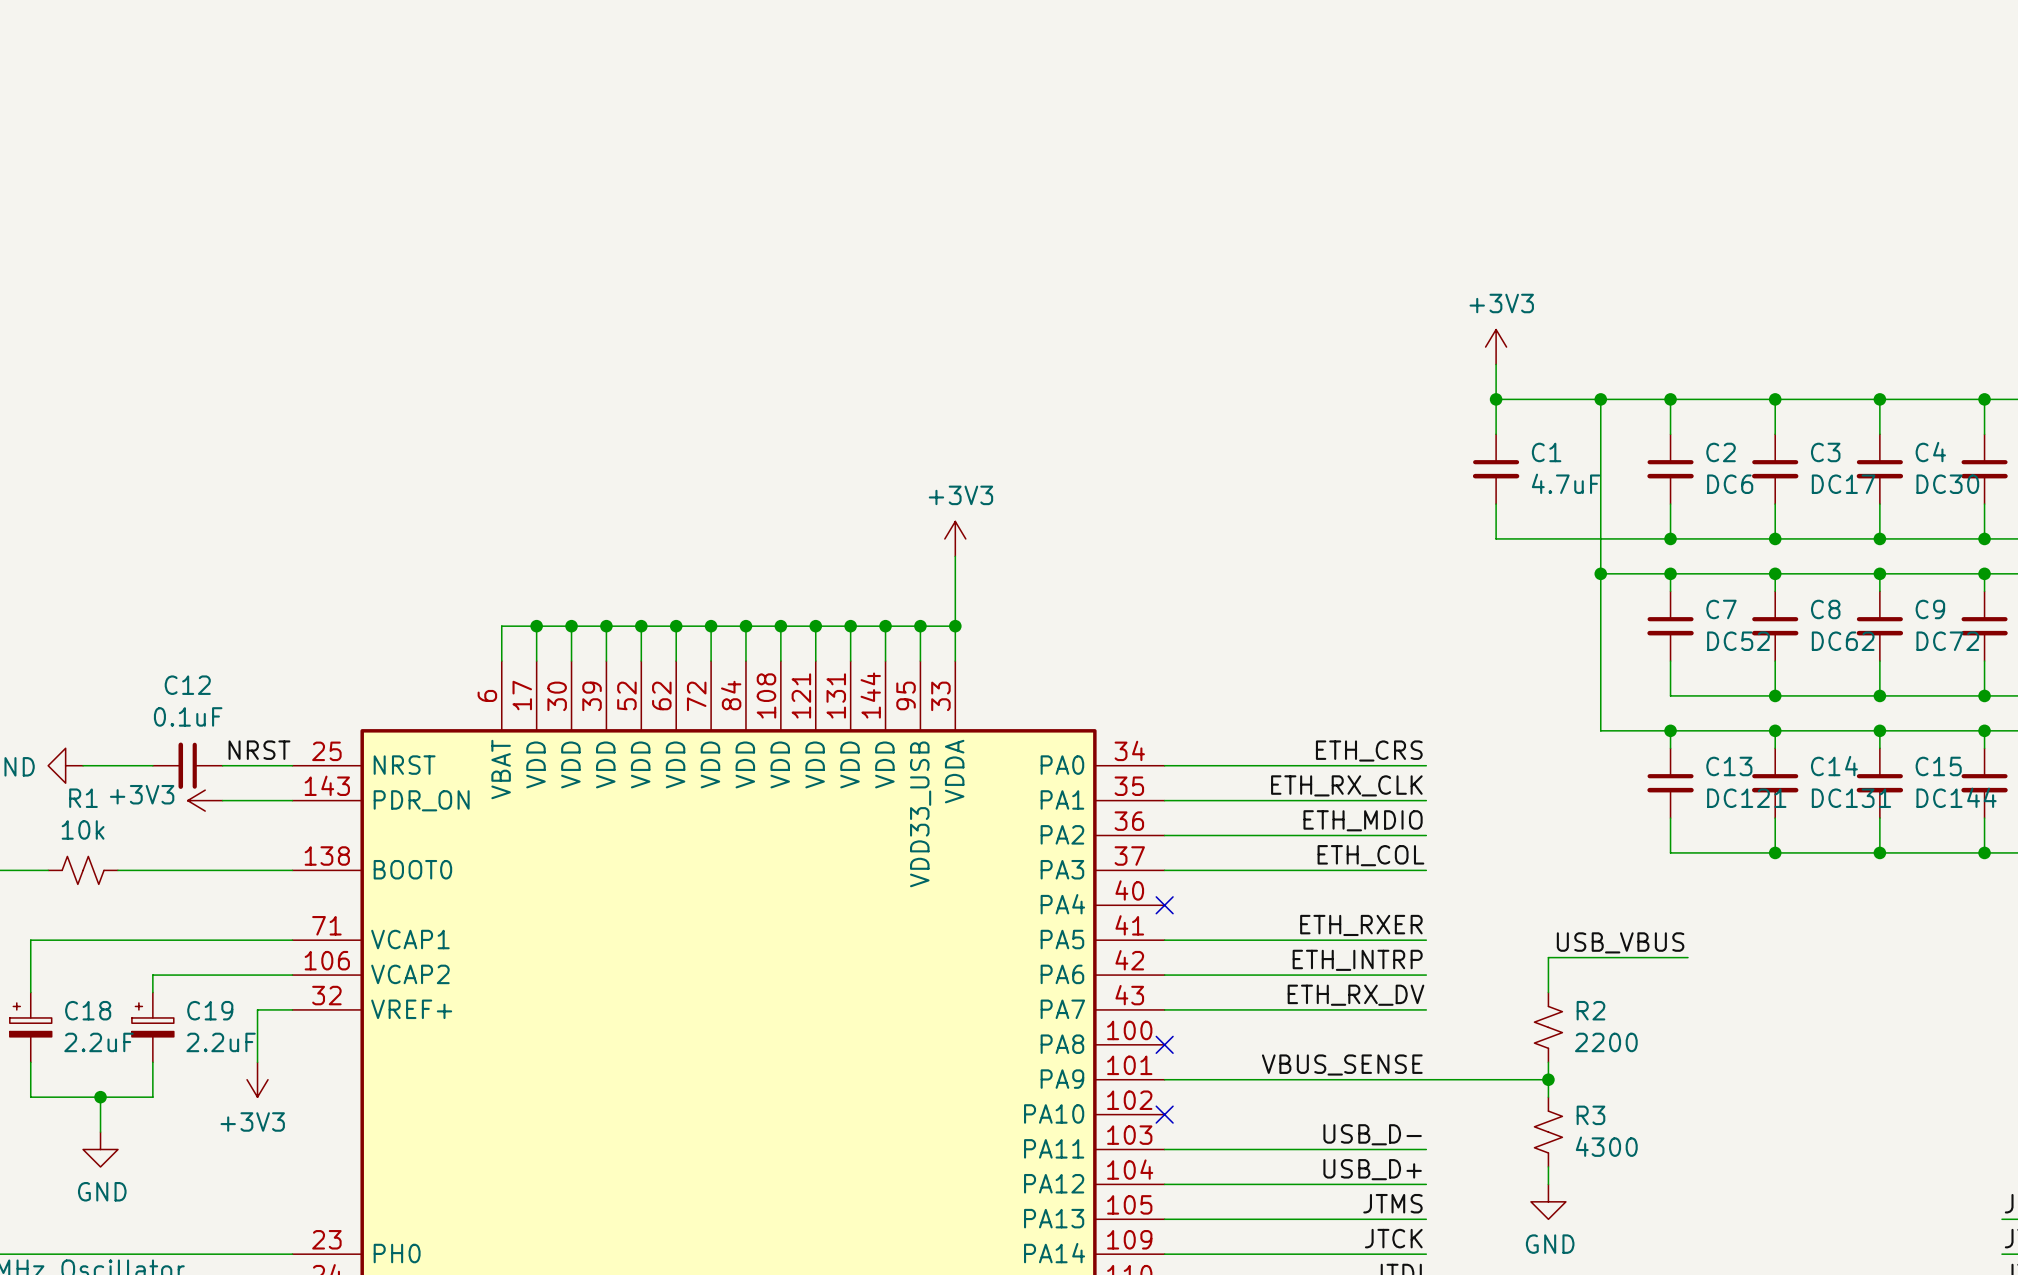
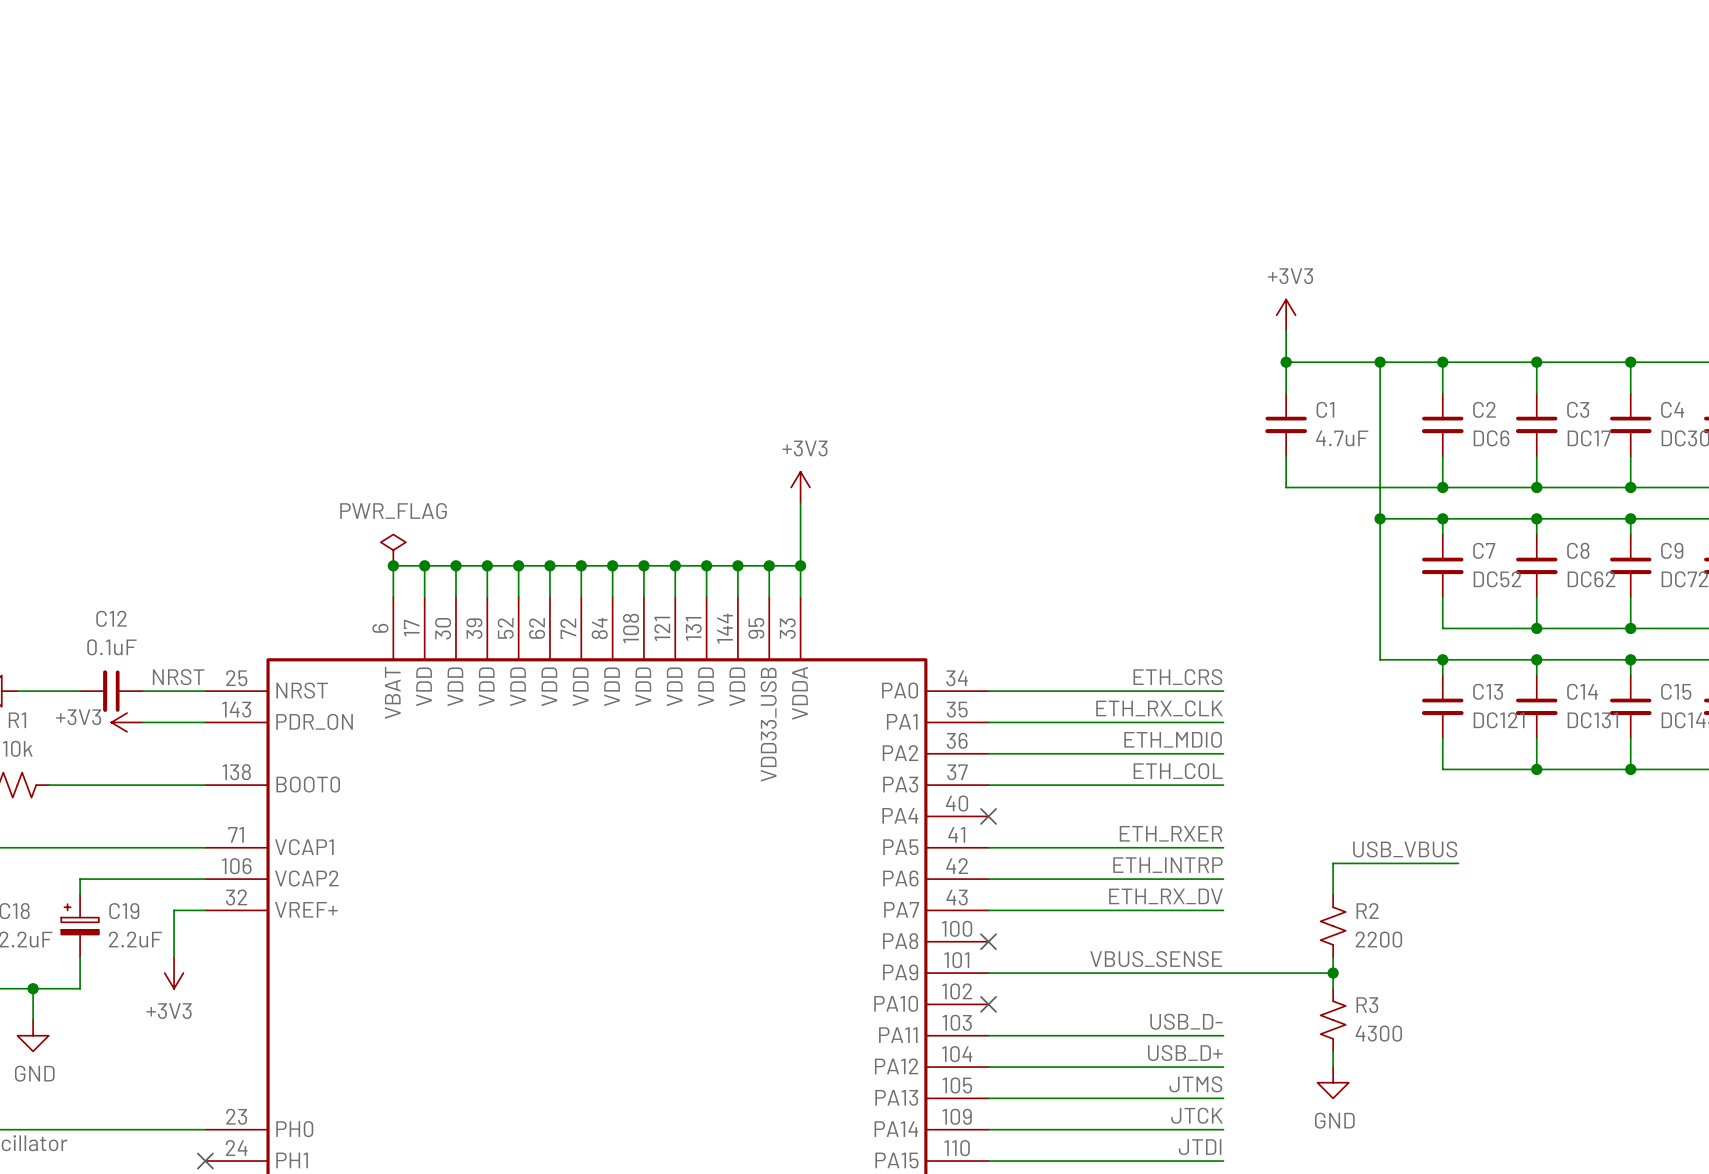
power symbol: none -> PWR_FLAG (393, 550)
junction: none -> (393, 565)

